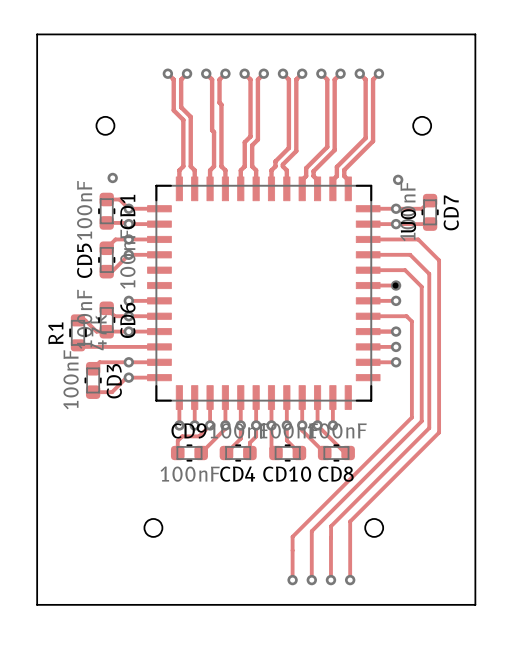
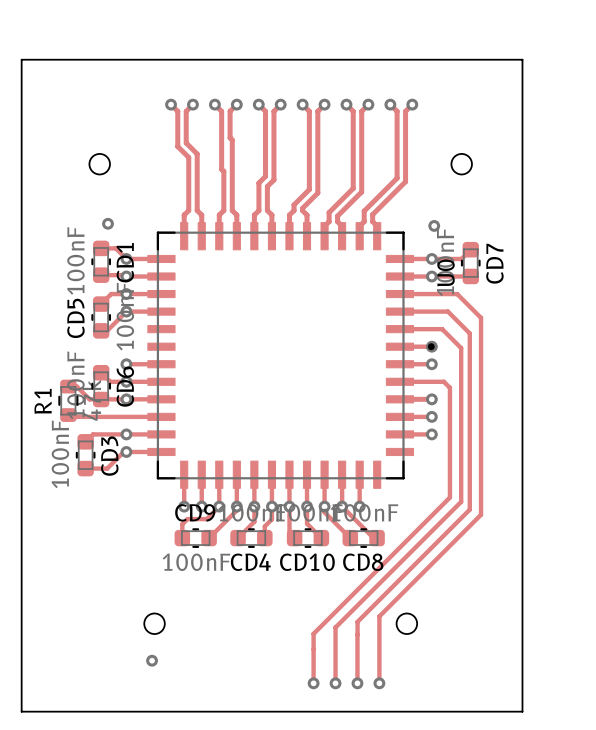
via: none -> (152, 660)

